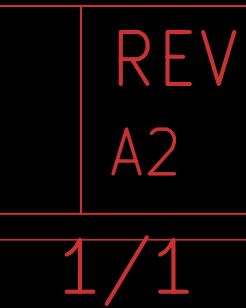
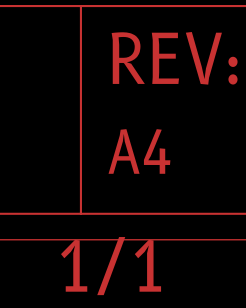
text: A2 (143, 151) -> A4 (139, 151)

